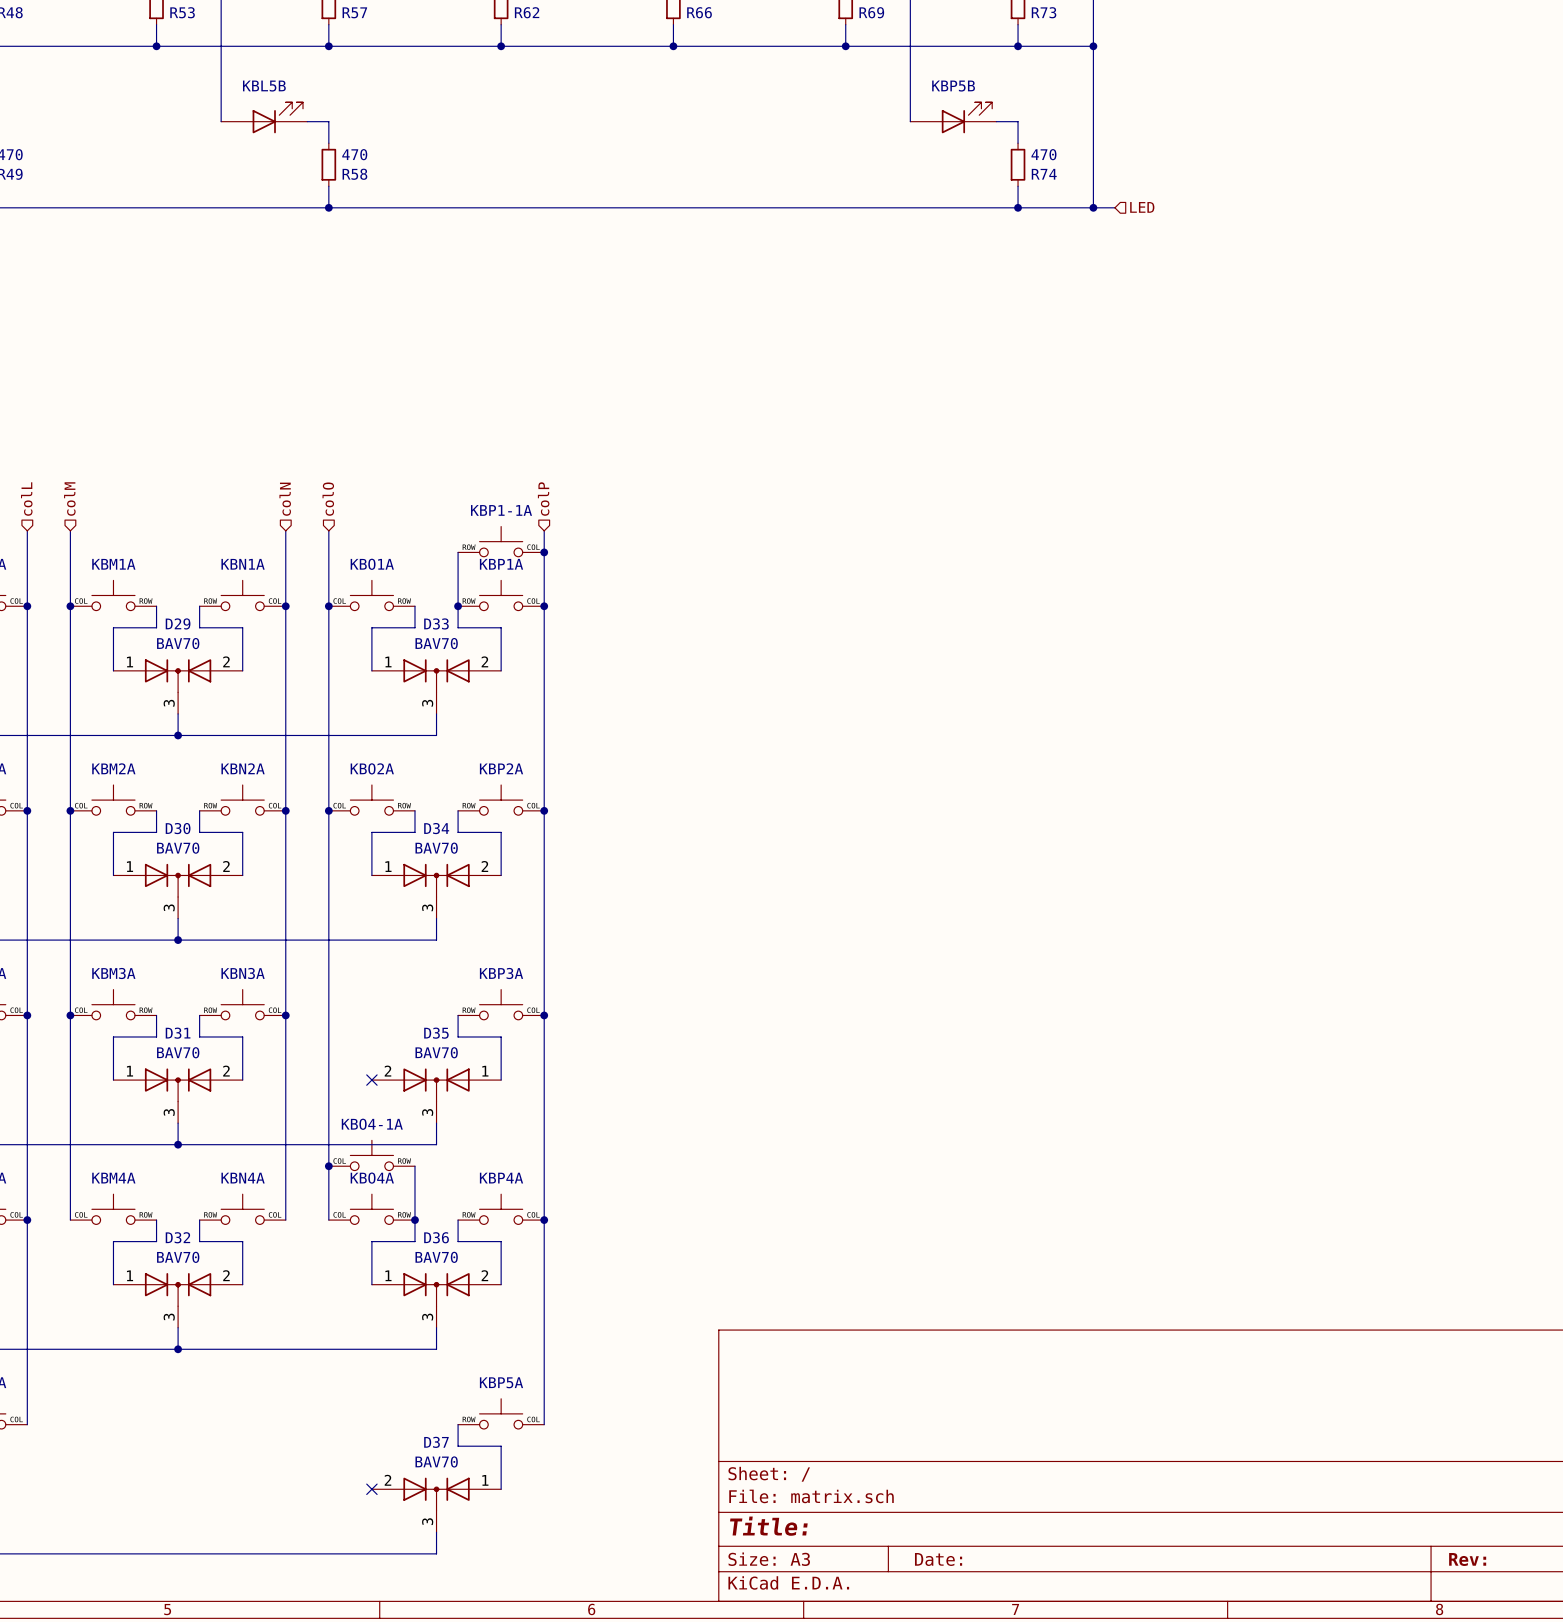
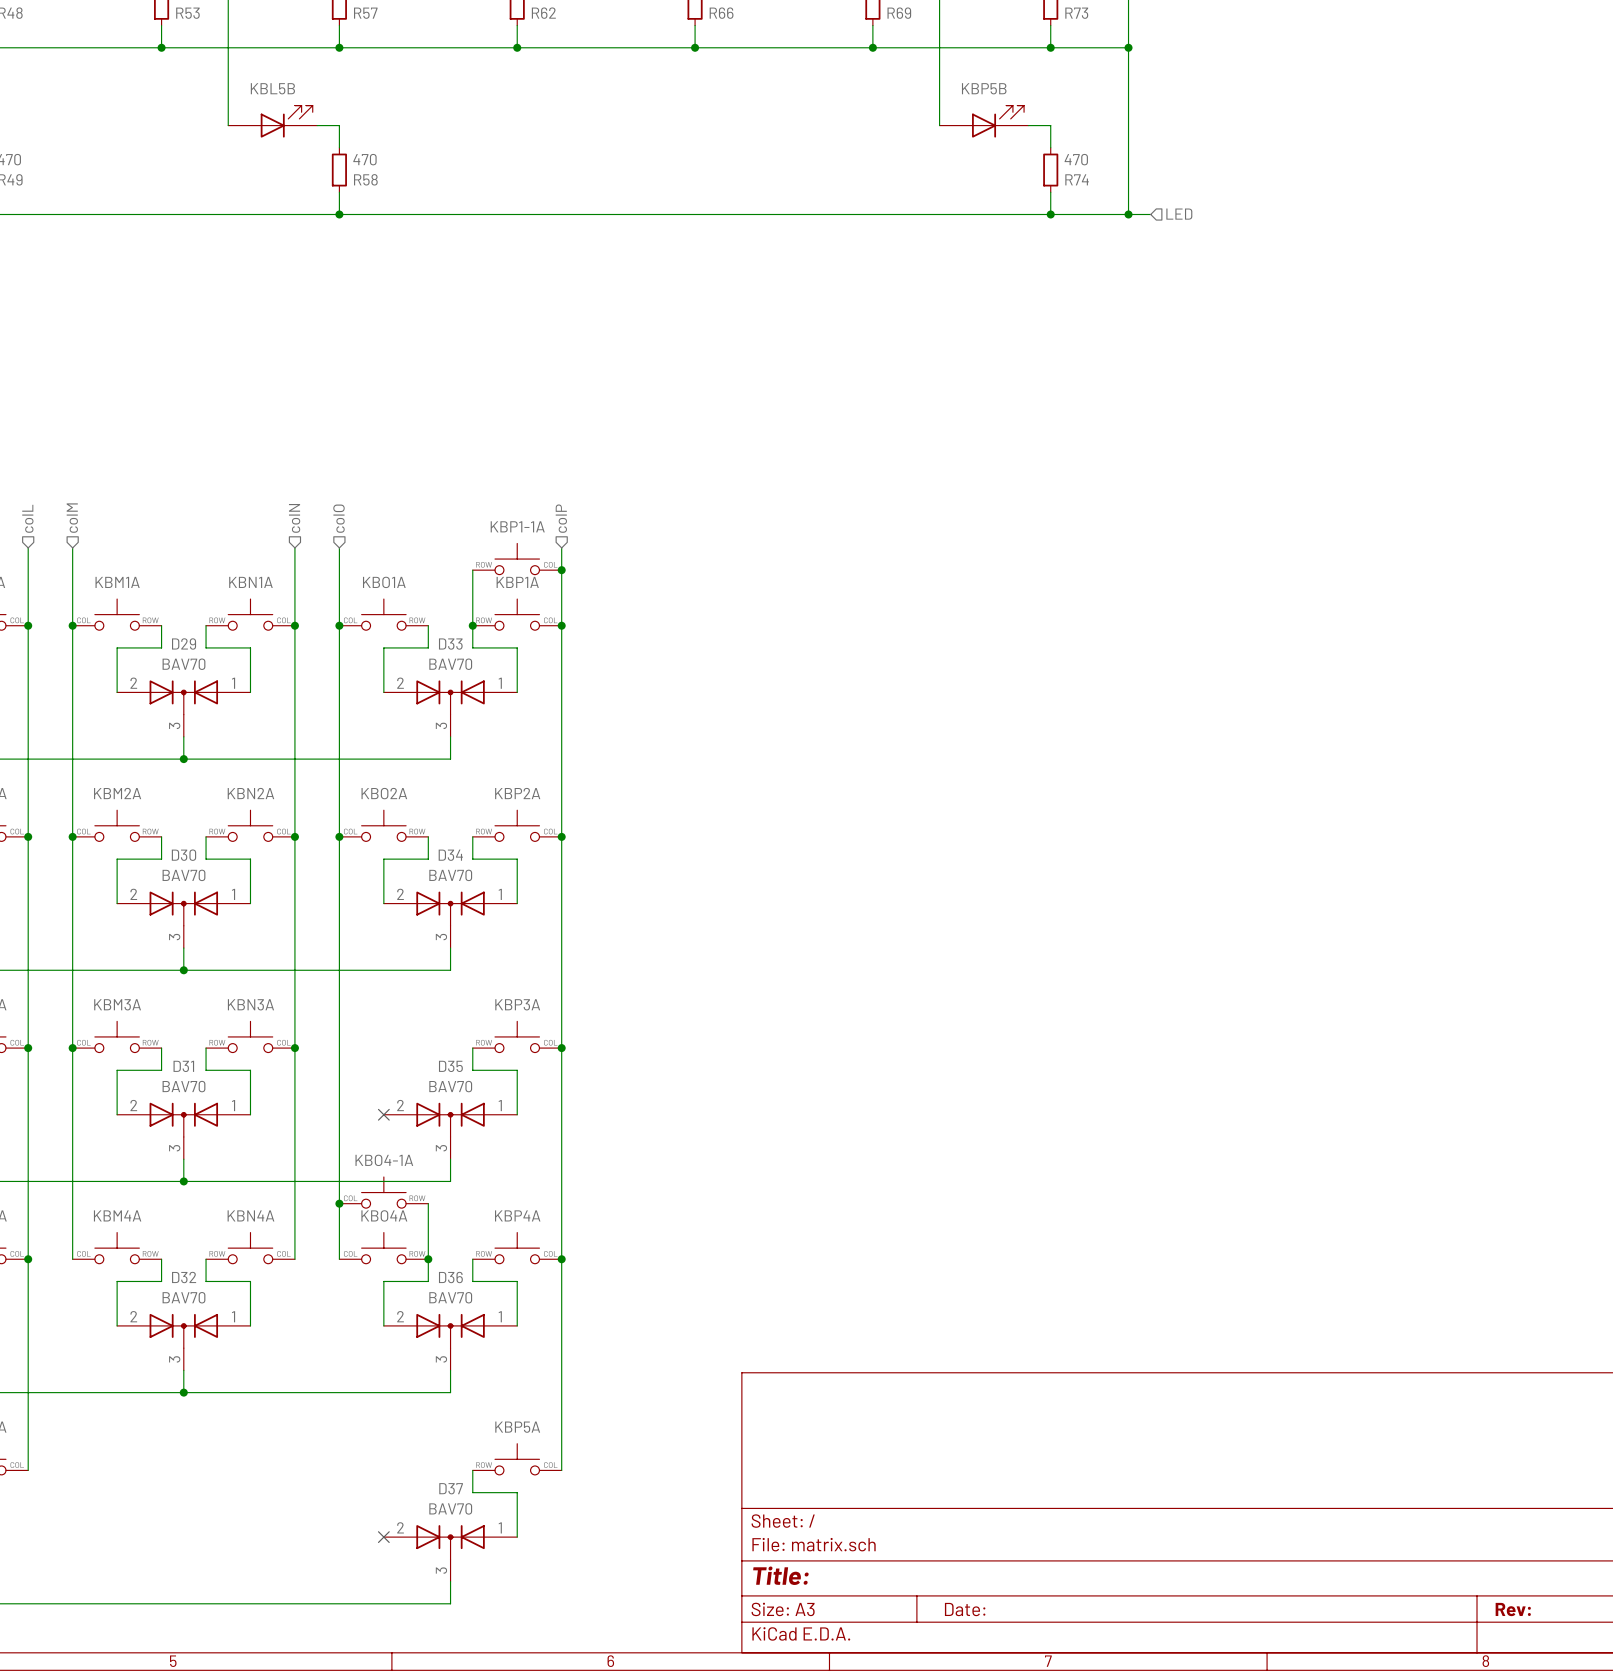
D29 flip: as is (178, 675) -> left-right (183, 697)
D33 flip: as is (436, 675) -> left-right (450, 697)
D30 flip: as is (178, 880) -> left-right (183, 908)
D34 flip: as is (436, 880) -> left-right (450, 908)
D31 flip: as is (178, 1085) -> left-right (183, 1119)
D32 flip: as is (178, 1289) -> left-right (183, 1331)
D36 flip: as is (436, 1289) -> left-right (450, 1331)

